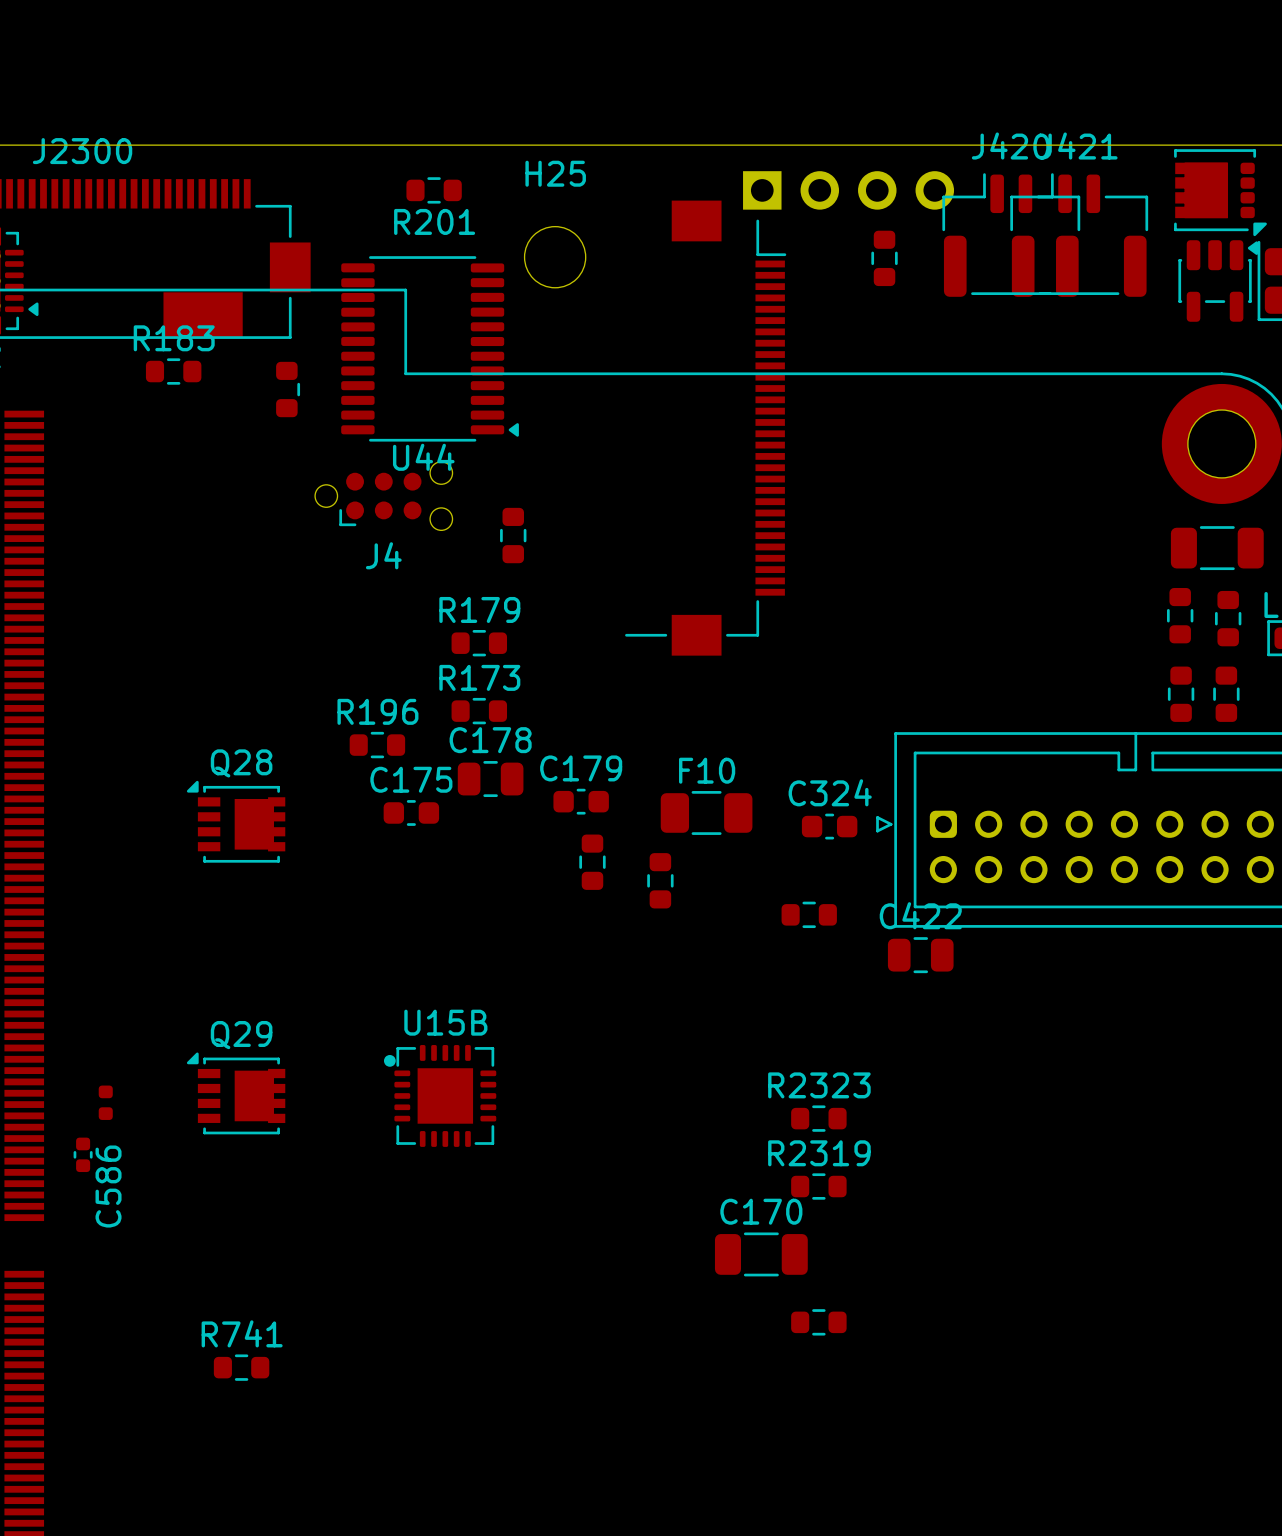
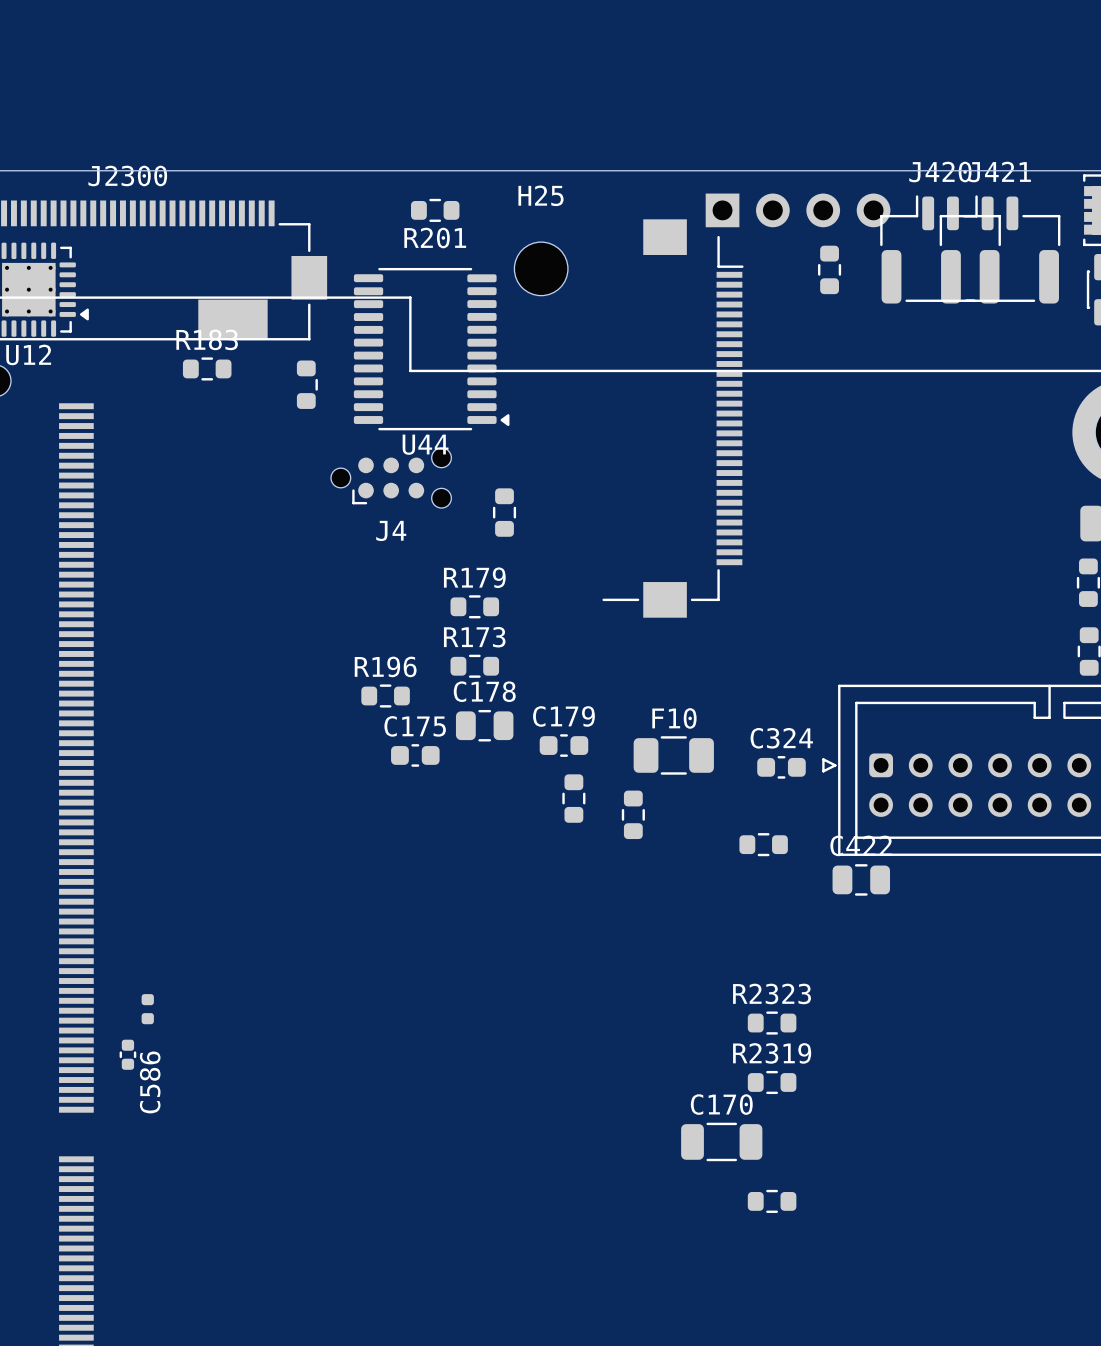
Q28: (236, 821) -> none
Q29: (236, 1093) -> none
U15B: (440, 1095) -> none
R741: (241, 1367) -> none

